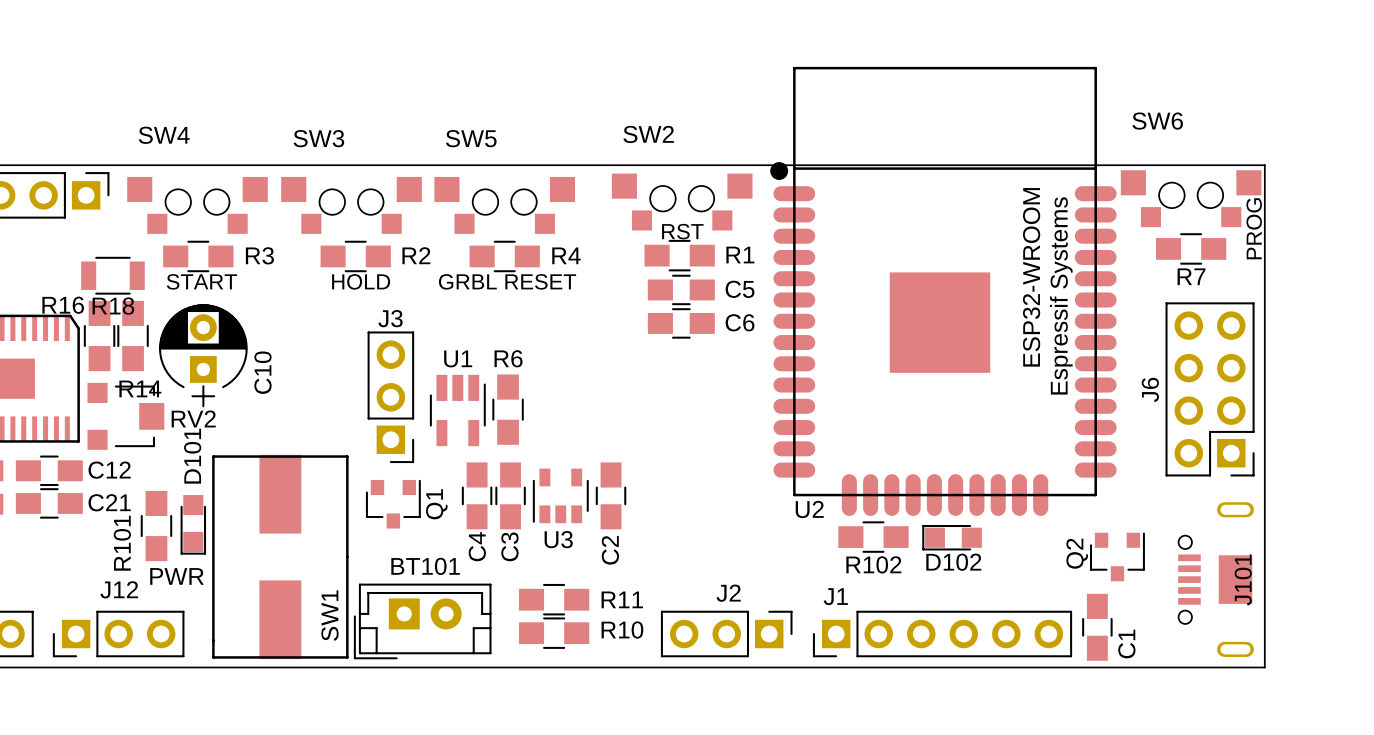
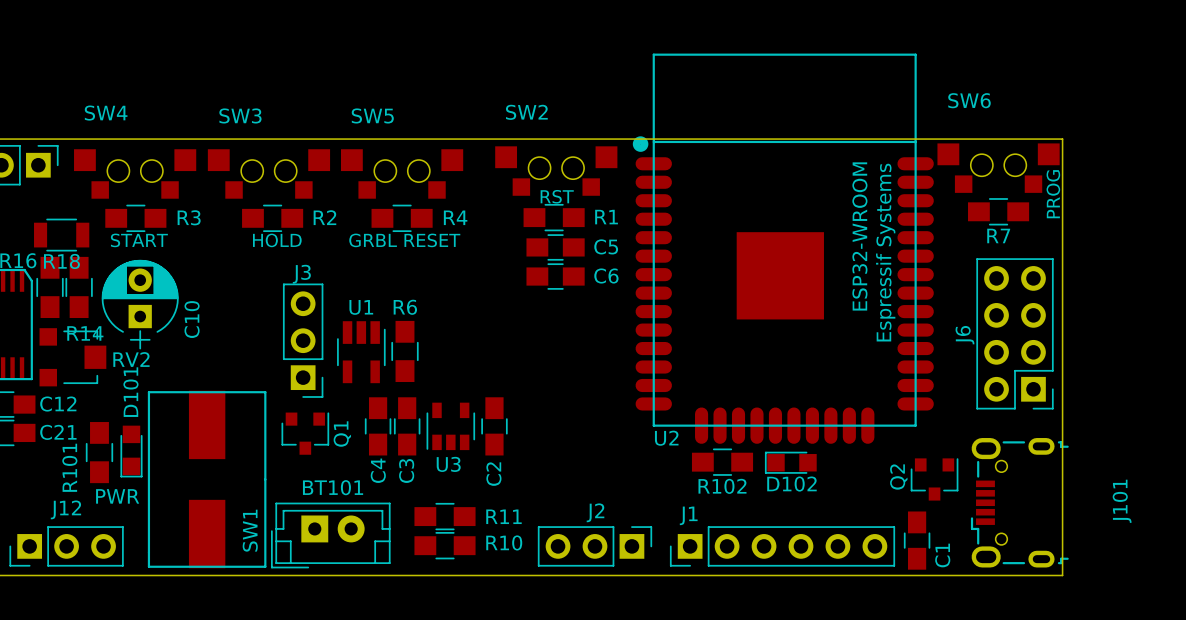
J101 footprint: [1178, 502, 1254, 657] -> [970, 438, 1069, 568]
J101 name position: J101 (1243, 579) -> J101 (1122, 501)

